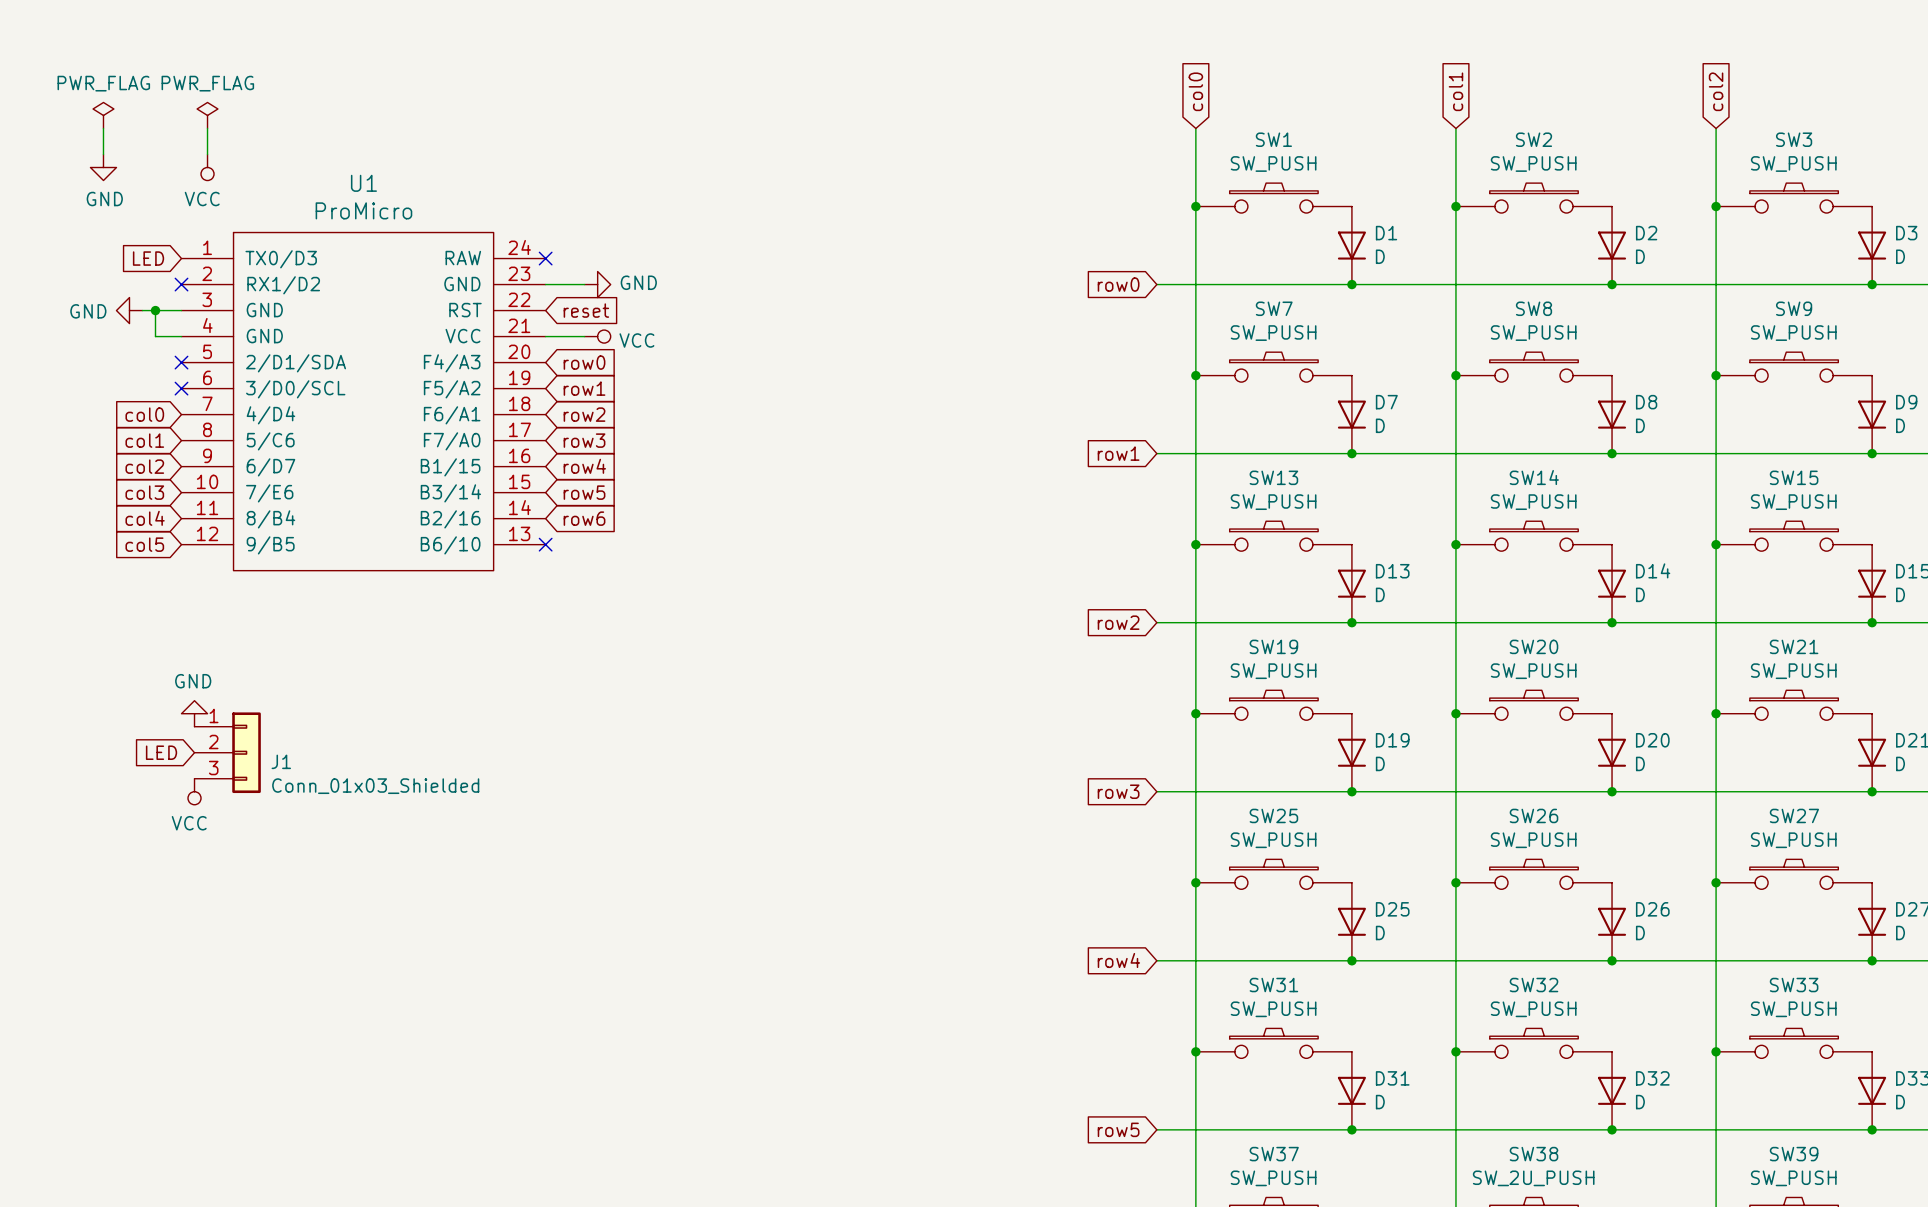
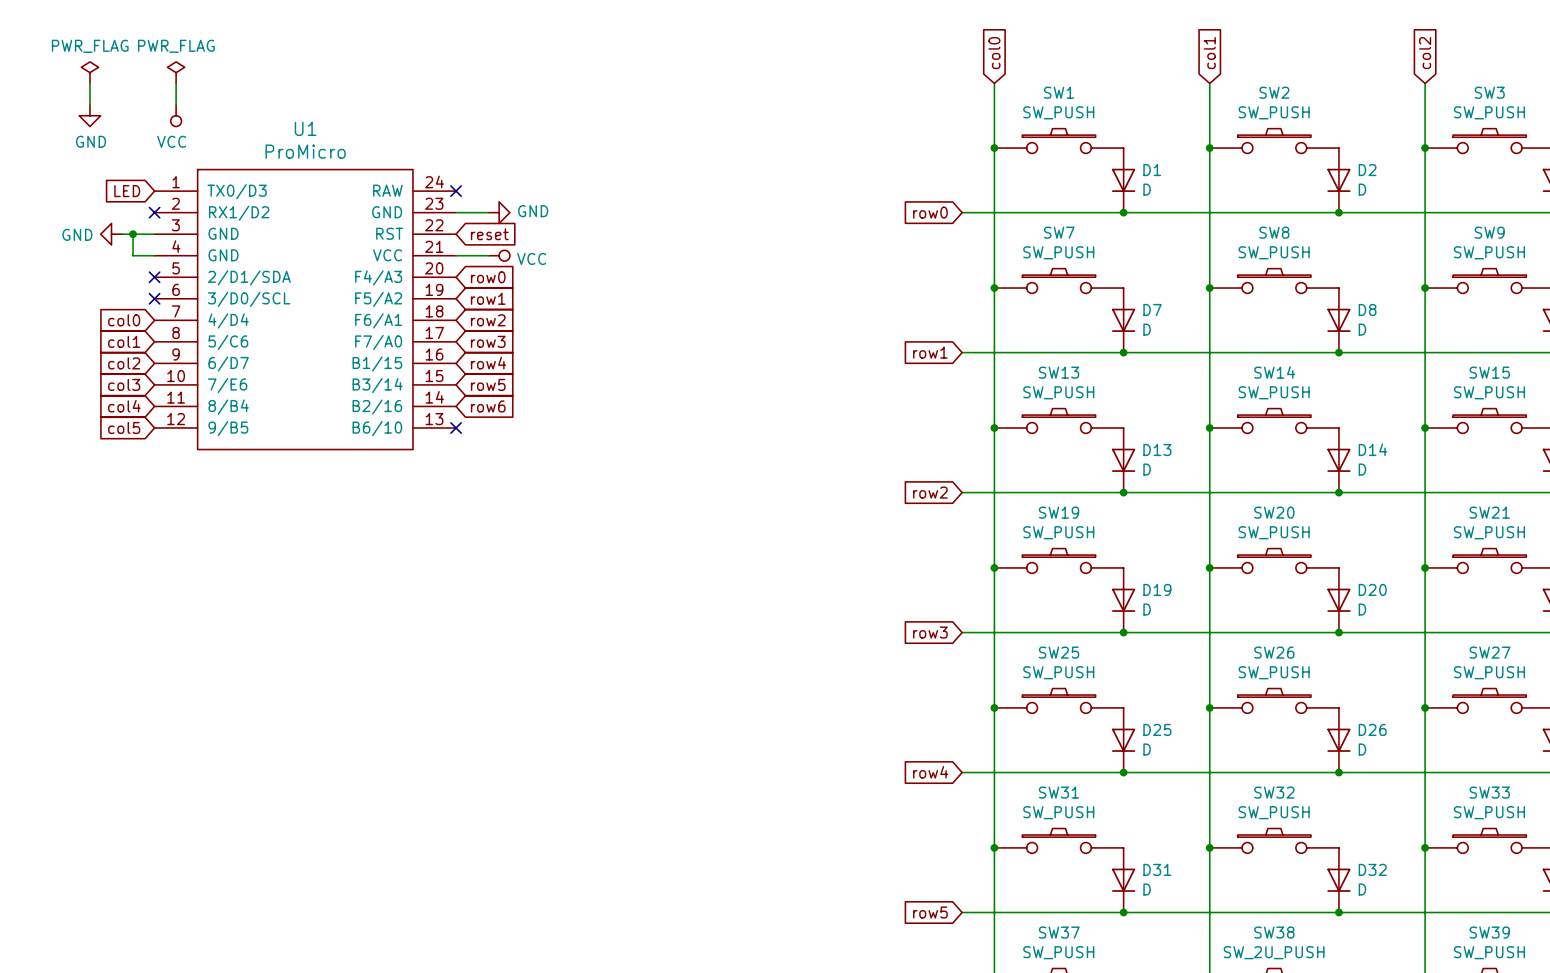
power symbol: GND (194, 713) -> none
global label: LED (161, 752) -> none
J1: Conn_01x03_Shielded (227, 752) -> none
power symbol: VCC (194, 791) -> none

